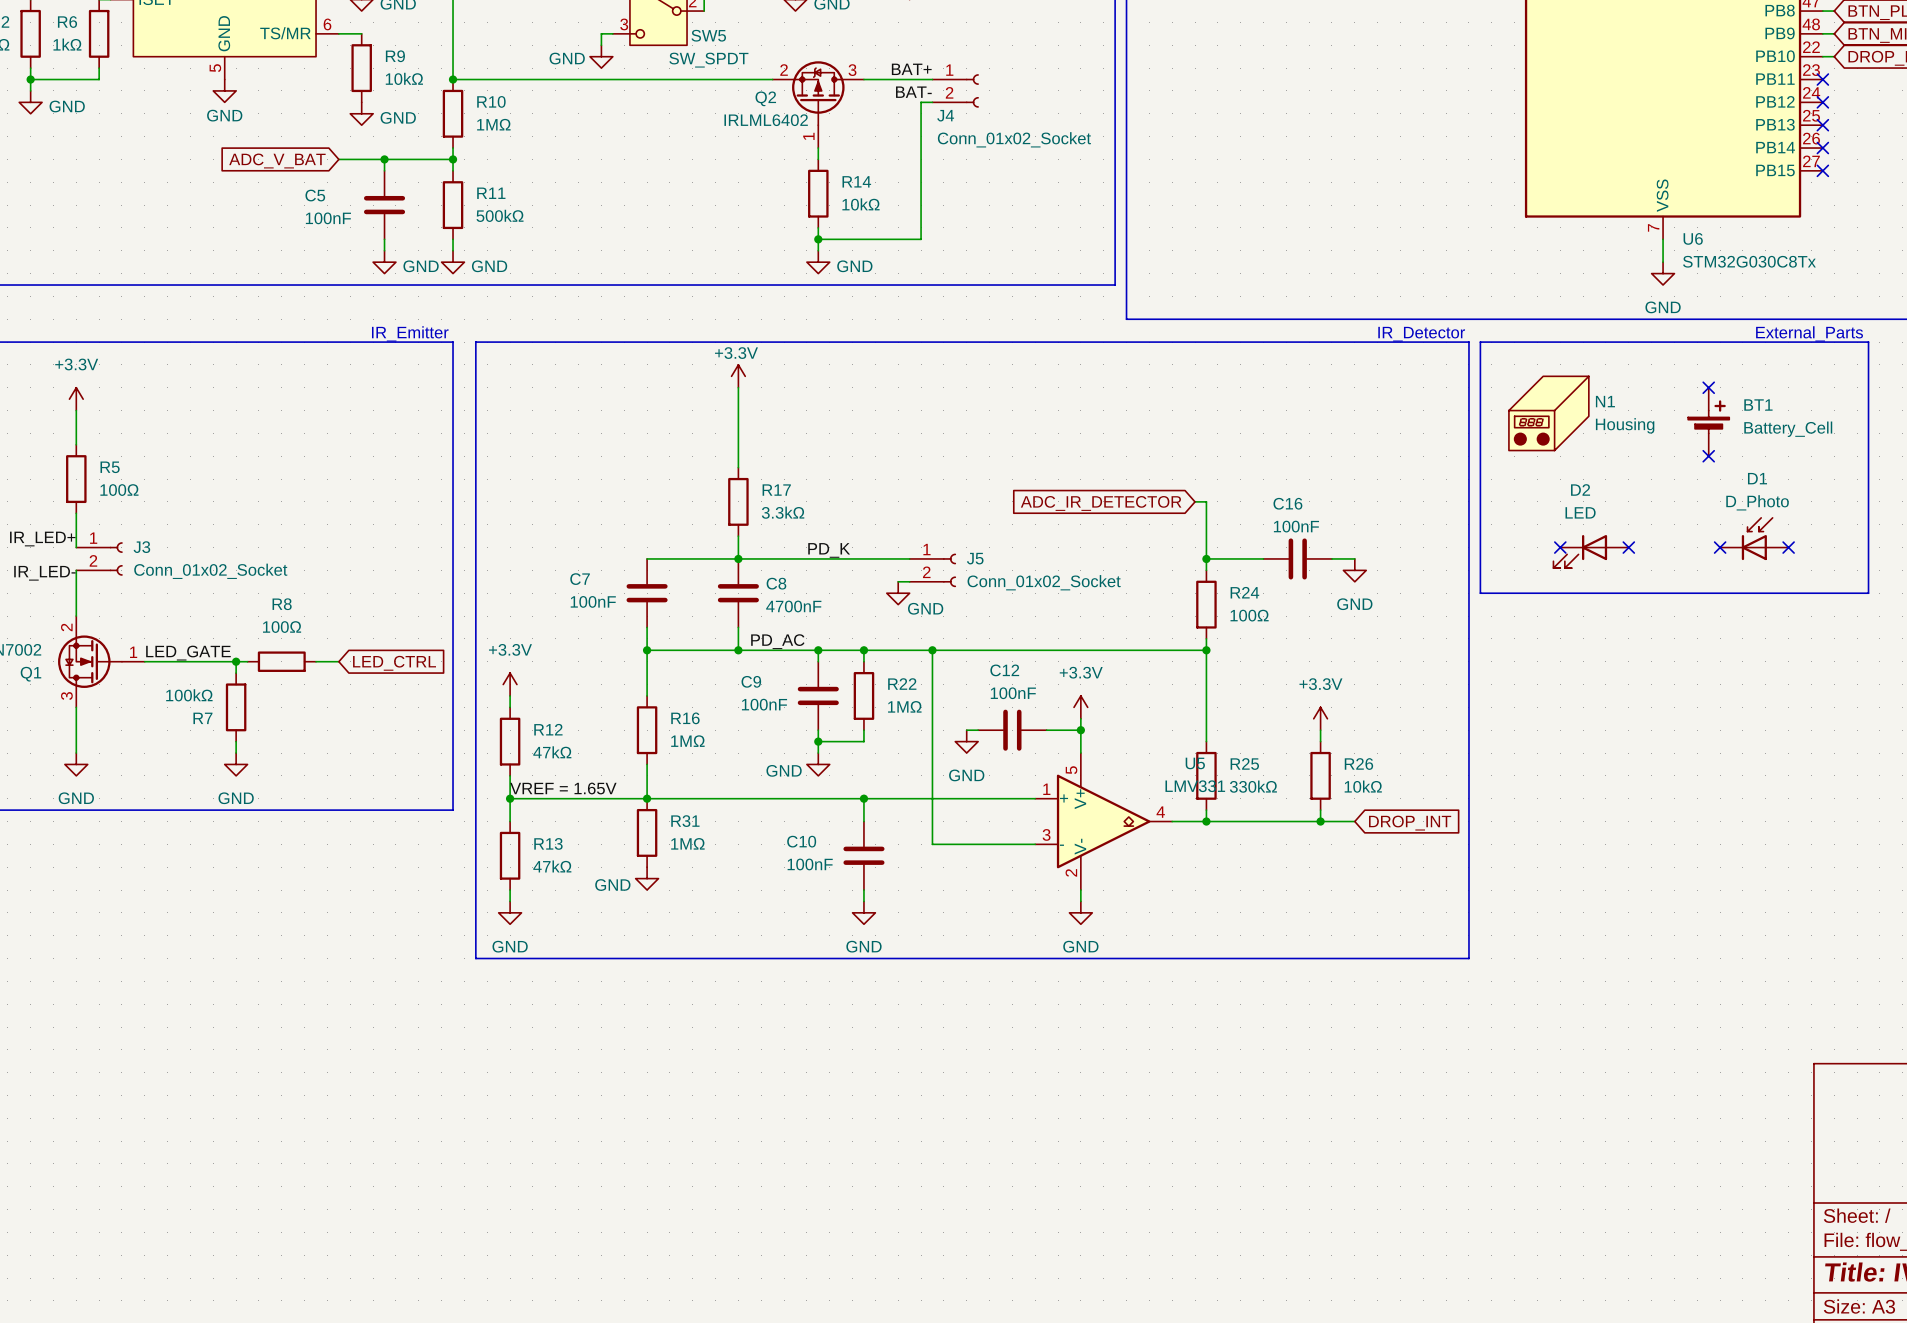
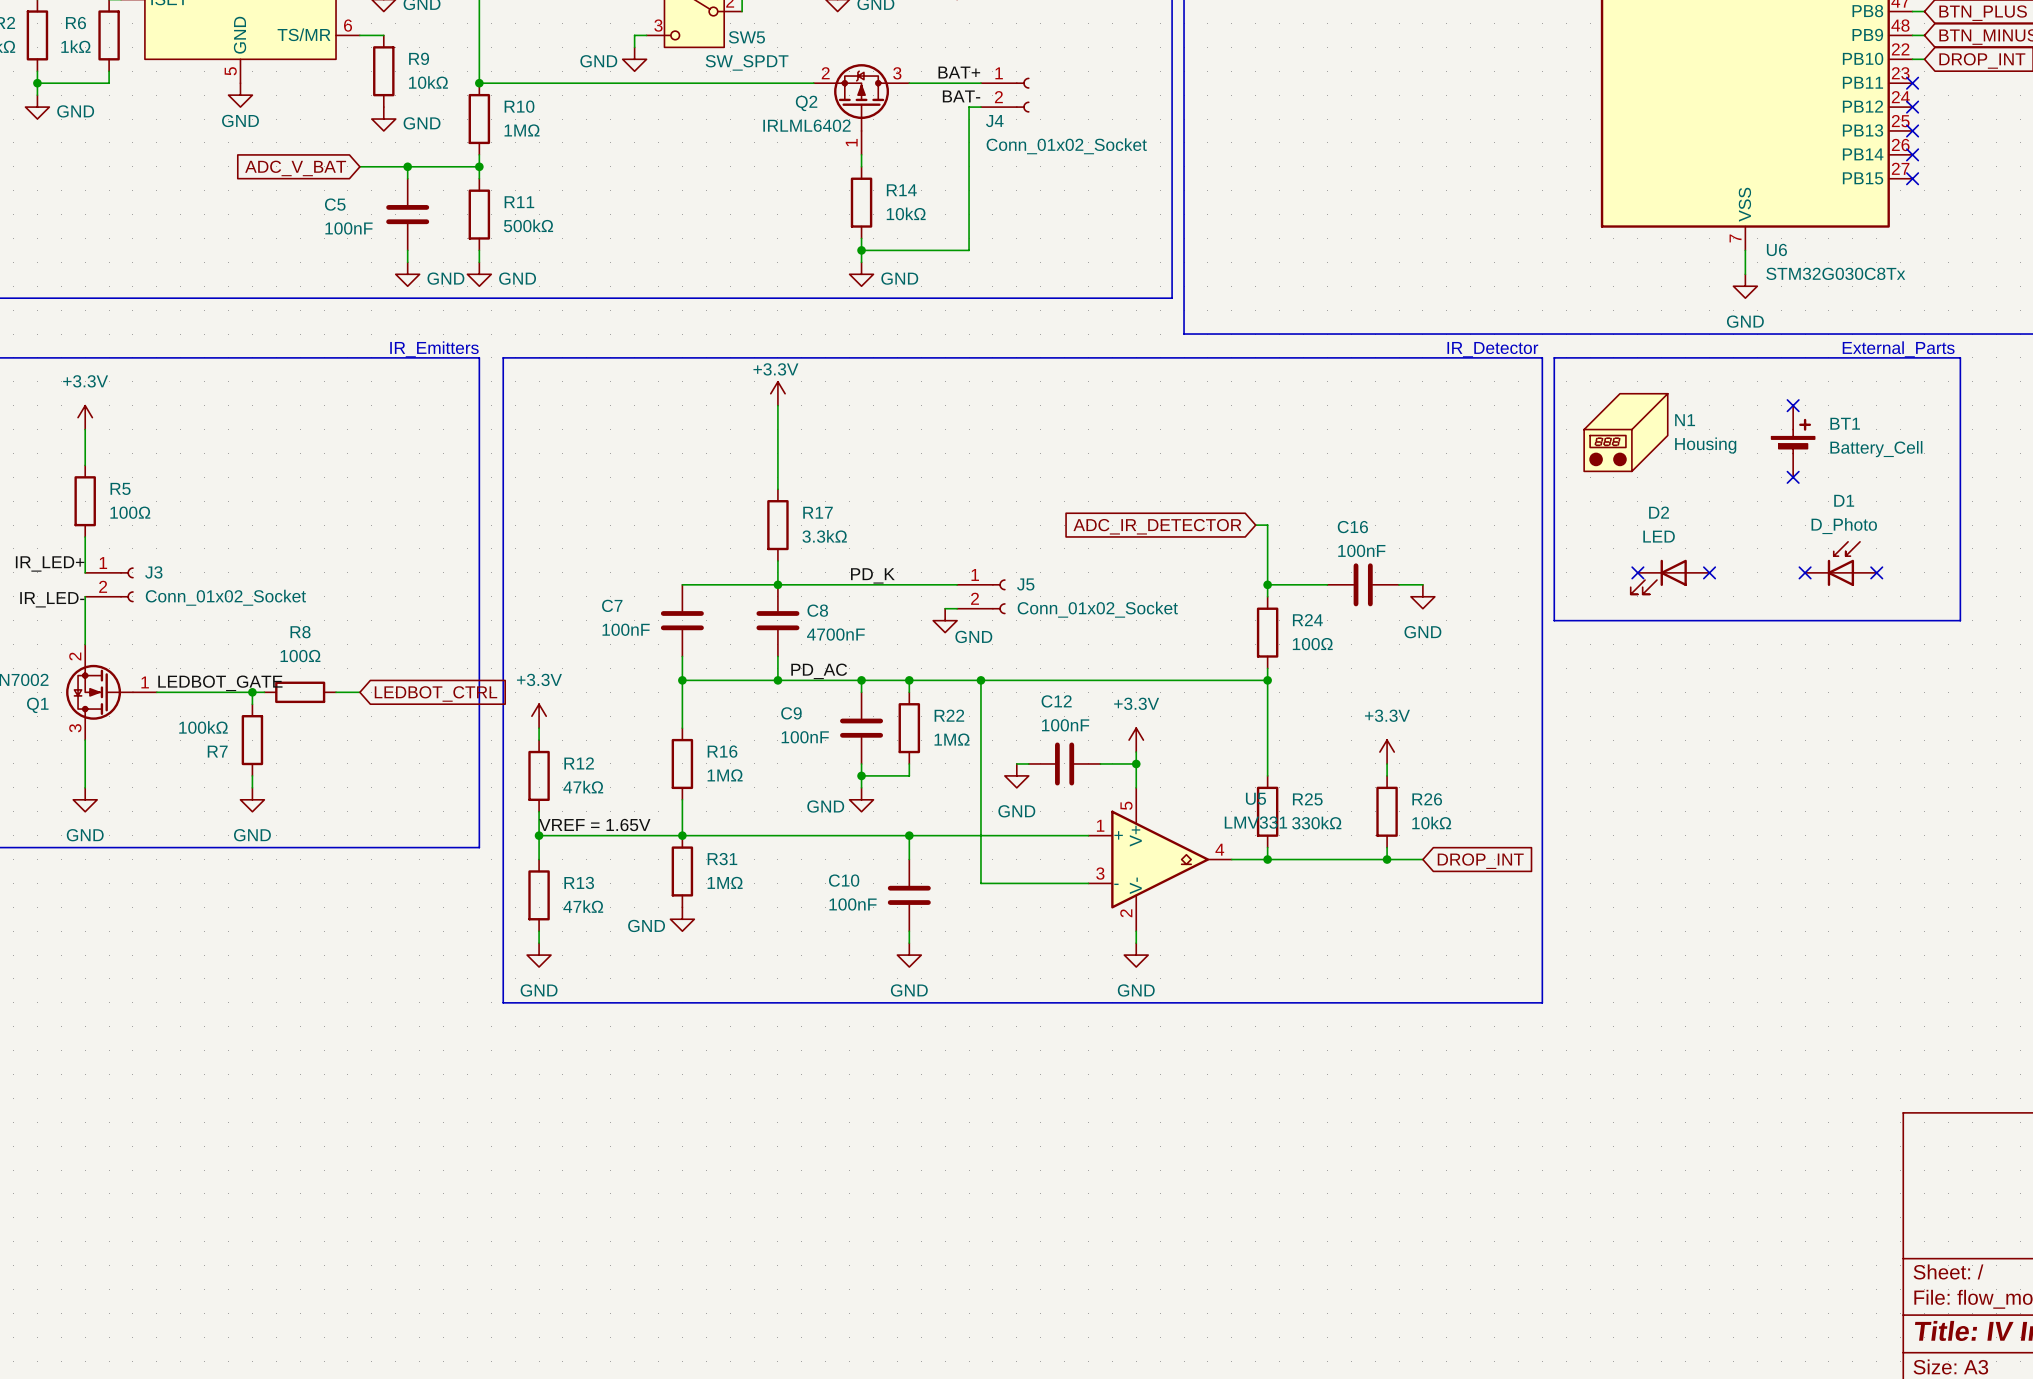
text: IR_Emitter (410, 333) -> IR_Emitters (434, 349)
label: LED_GATE (188, 653) -> LEDBOT_GATE (220, 683)
global label: LED_CTRL (394, 663) -> LEDBOT_CTRL (435, 693)

